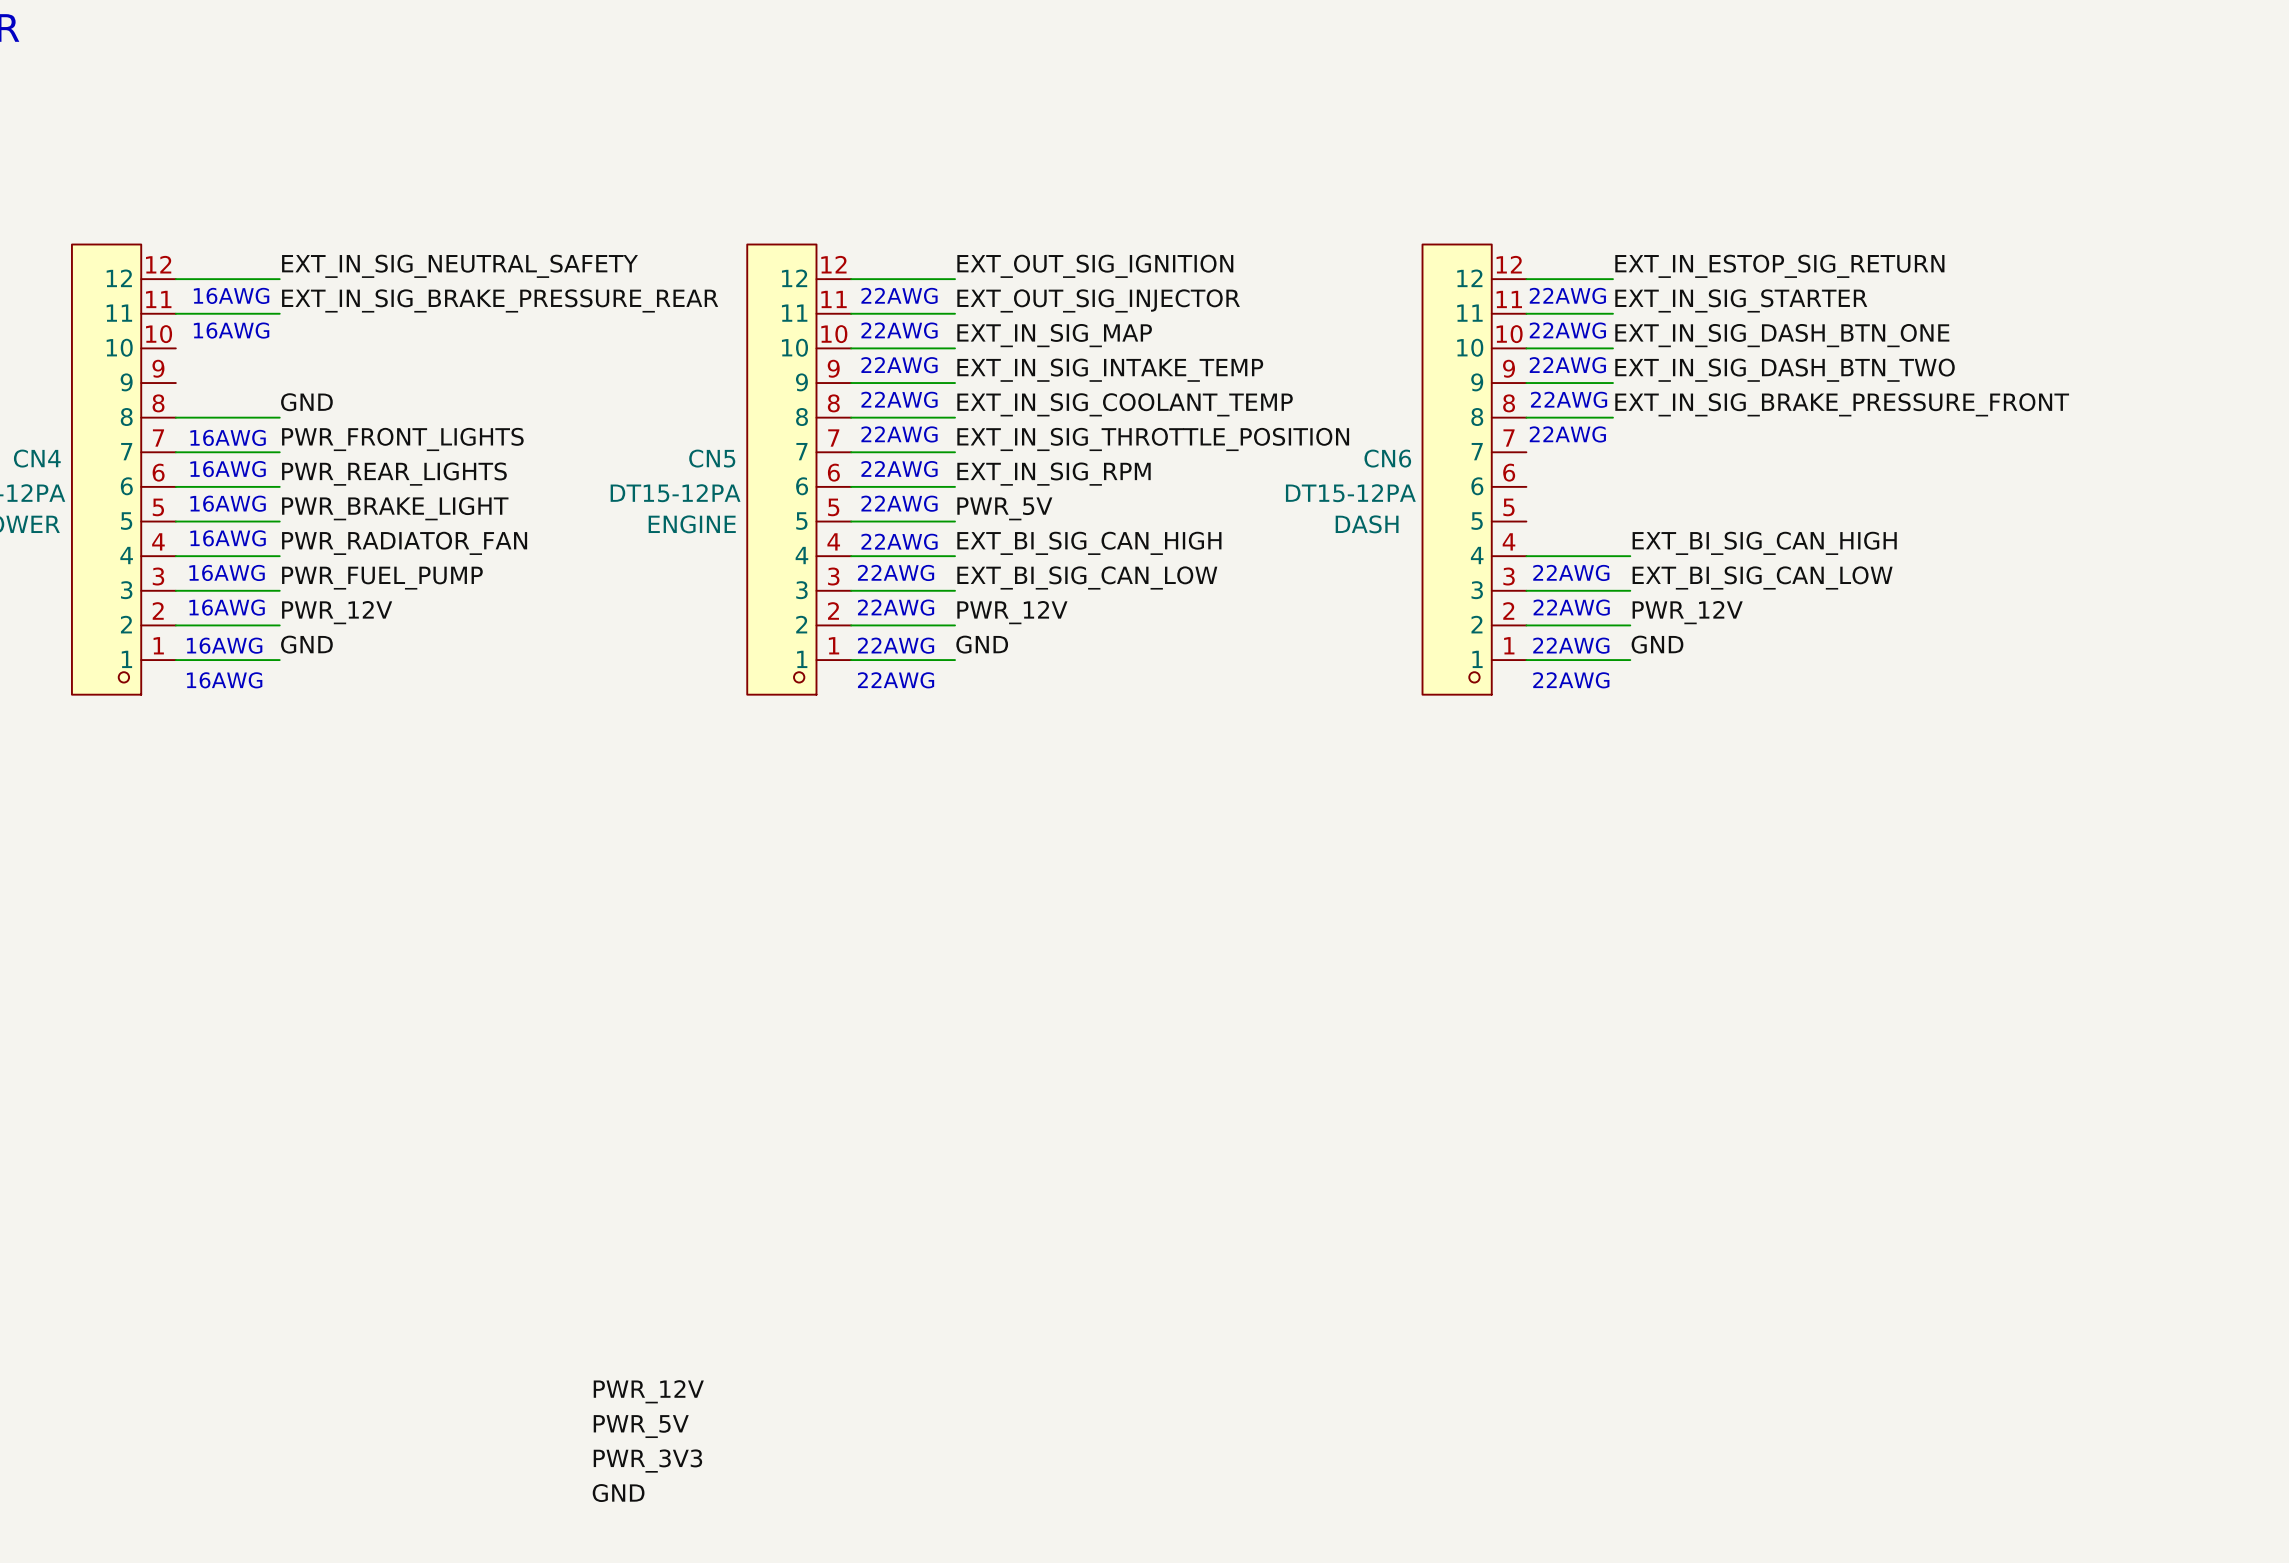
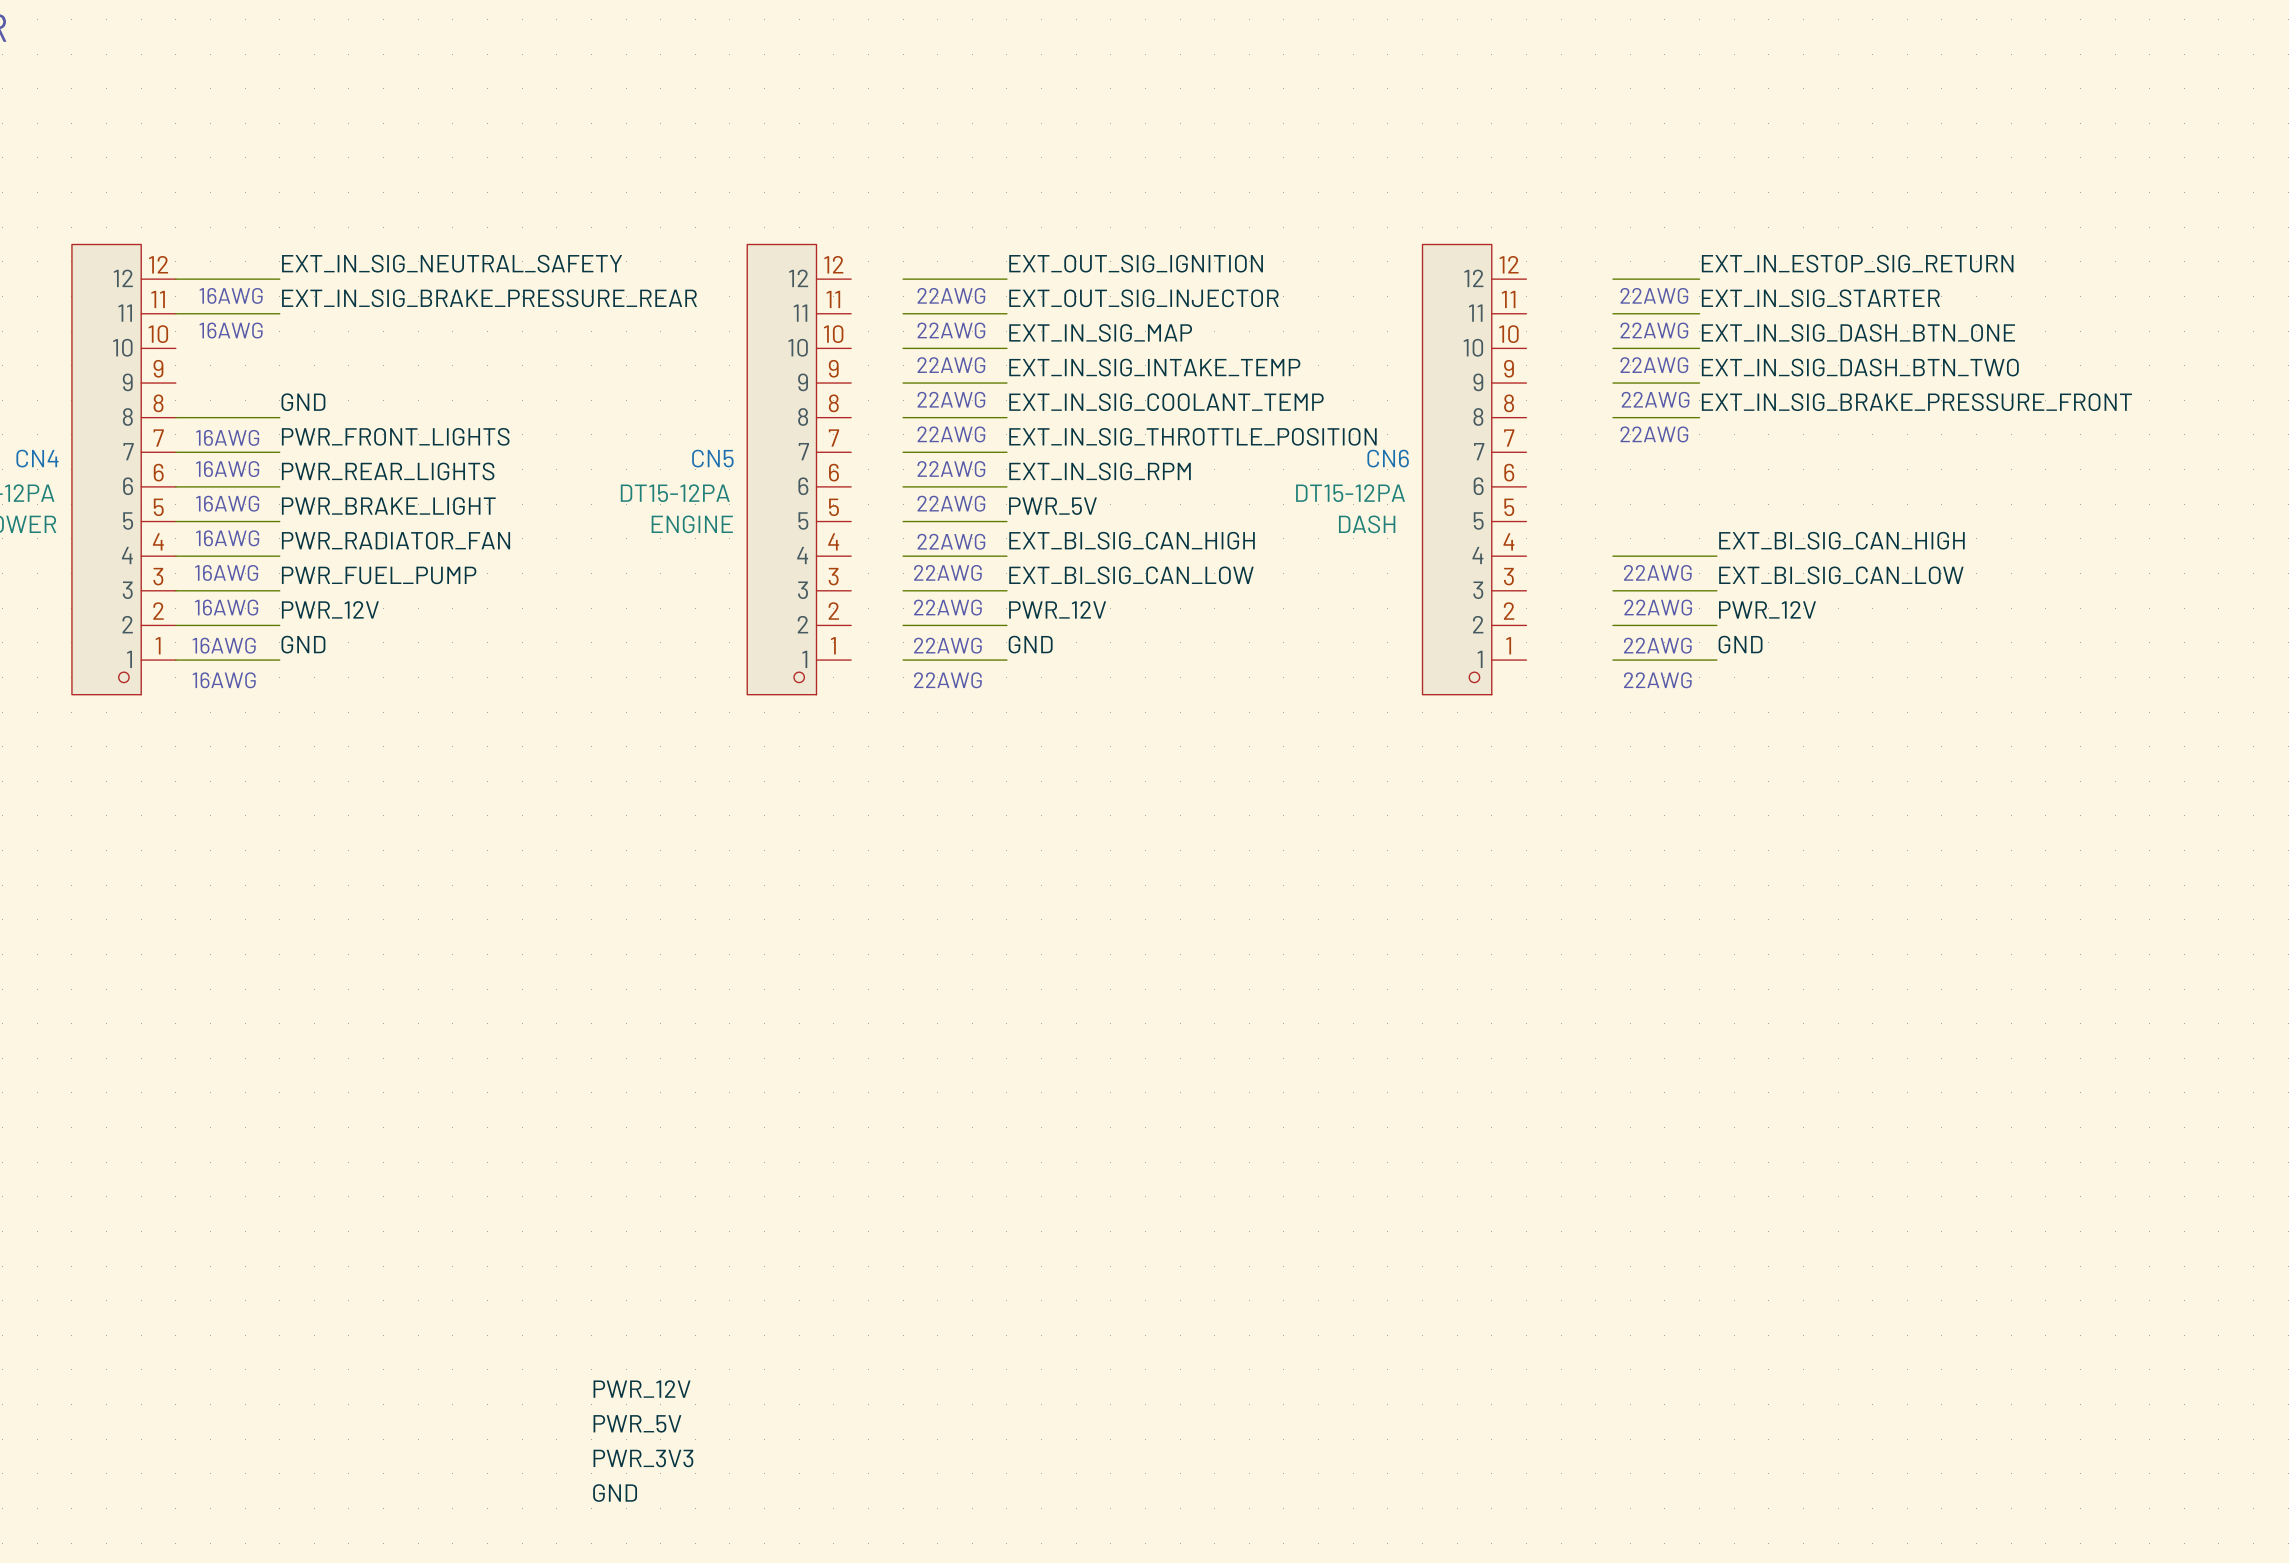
label position: EXT_OUT_SIG_IGNITION (1095, 266) -> EXT_OUT_SIG_IGNITION (1136, 263)
label position: EXT_IN_ESTOP_SIG_RETURN (1779, 266) -> EXT_IN_ESTOP_SIG_RETURN (1857, 263)
wire: (851, 279) (903, 279) -> (955, 279) (1006, 279)
wire: (1526, 279) (1612, 279) -> (1699, 279) (1612, 279)
text position: 22AWG (899, 295) -> 22AWG (951, 295)
text position: 22AWG (1567, 295) -> 22AWG (1654, 295)
label position: EXT_OUT_SIG_INJECTOR (1098, 300) -> EXT_OUT_SIG_INJECTOR (1144, 298)
label position: EXT_IN_SIG_STARTER (1741, 300) -> EXT_IN_SIG_STARTER (1820, 298)
wire: (851, 313) (903, 313) -> (955, 313) (1006, 313)
wire: (1526, 313) (1612, 313) -> (1699, 313) (1612, 313)
text position: 22AWG (899, 330) -> 22AWG (951, 330)
text position: 22AWG (1567, 330) -> 22AWG (1654, 330)
label position: EXT_IN_SIG_MAP (1054, 335) -> EXT_IN_SIG_MAP (1100, 332)
label position: EXT_IN_SIG_DASH_BTN_ONE (1782, 335) -> EXT_IN_SIG_DASH_BTN_ONE (1858, 332)
wire: (851, 348) (903, 348) -> (955, 348) (1006, 348)
wire: (1526, 348) (1612, 348) -> (1699, 348) (1612, 348)
text position: 22AWG (899, 365) -> 22AWG (951, 365)
text position: 22AWG (1567, 365) -> 22AWG (1654, 365)
label position: EXT_IN_SIG_INTAKE_TEMP (1110, 370) -> EXT_IN_SIG_INTAKE_TEMP (1154, 367)
label position: EXT_IN_SIG_DASH_BTN_TWO (1785, 370) -> EXT_IN_SIG_DASH_BTN_TWO (1860, 367)
wire: (851, 383) (903, 383) -> (955, 383) (1006, 383)
wire: (1526, 383) (1612, 383) -> (1699, 383) (1612, 383)
text position: 22AWG (899, 399) -> 22AWG (951, 399)
text position: 22AWG (1569, 399) -> 22AWG (1655, 399)
label position: EXT_IN_SIG_COOLANT_TEMP (1125, 404) -> EXT_IN_SIG_COOLANT_TEMP (1166, 402)
label position: EXT_IN_SIG_BRAKE_PRESSURE_FRONT (1842, 404) -> EXT_IN_SIG_BRAKE_PRESSURE_FRONT (1916, 402)
wire: (851, 417) (903, 417) -> (955, 417) (1006, 417)
wire: (1526, 417) (1612, 417) -> (1699, 417) (1612, 417)
text position: 22AWG (899, 434) -> 22AWG (951, 434)
text position: 22AWG (1567, 434) -> 22AWG (1654, 434)
label position: EXT_IN_SIG_THROTTLE_POSITION (1153, 439) -> EXT_IN_SIG_THROTTLE_POSITION (1192, 436)
wire: (851, 452) (903, 452) -> (955, 452) (1006, 452)
text position: 22AWG (899, 469) -> 22AWG (951, 469)
label position: EXT_IN_SIG_RPM (1054, 474) -> EXT_IN_SIG_RPM (1100, 471)
wire: (851, 486) (903, 486) -> (955, 486) (1006, 486)
text position: 22AWG (899, 503) -> 22AWG (951, 503)
label position: PWR_5V (1004, 508) -> PWR_5V (1053, 506)
wire: (851, 521) (903, 521) -> (955, 521) (1006, 521)
text: 22AWG (899, 541) -> none
text: none -> 22AWG (951, 541)
label position: EXT_BI_SIG_CAN_HIGH (1089, 543) -> EXT_BI_SIG_CAN_HIGH (1132, 540)
label position: EXT_BI_SIG_CAN_HIGH (1764, 543) -> EXT_BI_SIG_CAN_HIGH (1841, 540)
wire: (851, 556) (903, 556) -> (955, 556) (1006, 556)
wire: (1526, 556) (1612, 556) -> (1630, 556) (1716, 556)
text: 22AWG (896, 572) -> none
text: none -> 22AWG (947, 572)
text position: 22AWG (1571, 572) -> 22AWG (1657, 572)
label position: EXT_BI_SIG_CAN_LOW (1087, 577) -> EXT_BI_SIG_CAN_LOW (1131, 575)
label position: EXT_BI_SIG_CAN_LOW (1762, 577) -> EXT_BI_SIG_CAN_LOW (1841, 575)
wire: (851, 590) (903, 590) -> (955, 590) (1006, 590)
wire: (1526, 590) (1612, 590) -> (1630, 590) (1716, 590)
text position: 22AWG (896, 607) -> 22AWG (947, 607)
text position: 22AWG (1571, 607) -> 22AWG (1658, 607)
label position: PWR_12V (1012, 612) -> PWR_12V (1057, 609)
label position: PWR_12V (1687, 612) -> PWR_12V (1767, 609)
wire: (851, 625) (903, 625) -> (955, 625) (1006, 625)
wire: (1526, 625) (1612, 625) -> (1630, 625) (1716, 625)
label position: GND (982, 644) -> GND (1030, 644)
label position: GND (1657, 644) -> GND (1740, 644)
text position: 22AWG (896, 645) -> 22AWG (947, 645)
text position: 22AWG (1571, 645) -> 22AWG (1657, 645)
wire: (851, 660) (903, 660) -> (955, 660) (1006, 660)
wire: (1526, 660) (1612, 660) -> (1630, 660) (1716, 660)
text position: 22AWG (896, 680) -> 22AWG (947, 680)
text position: 22AWG (1571, 680) -> 22AWG (1657, 680)

